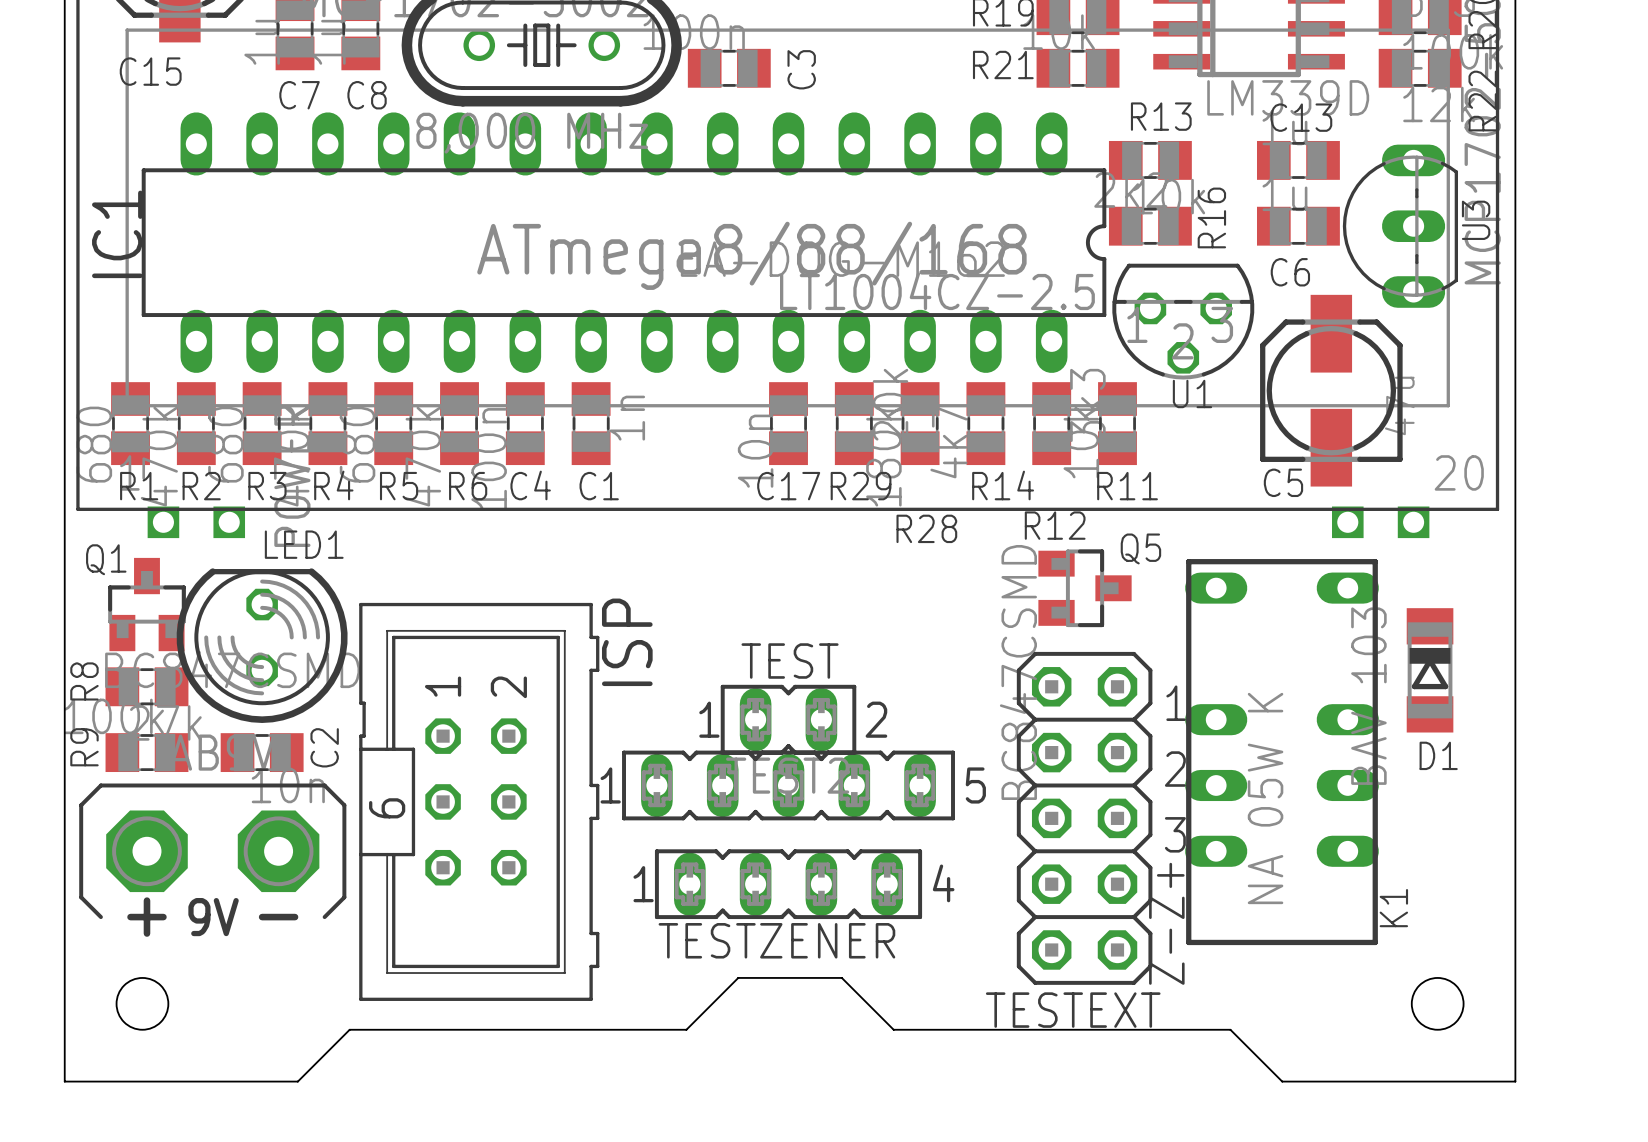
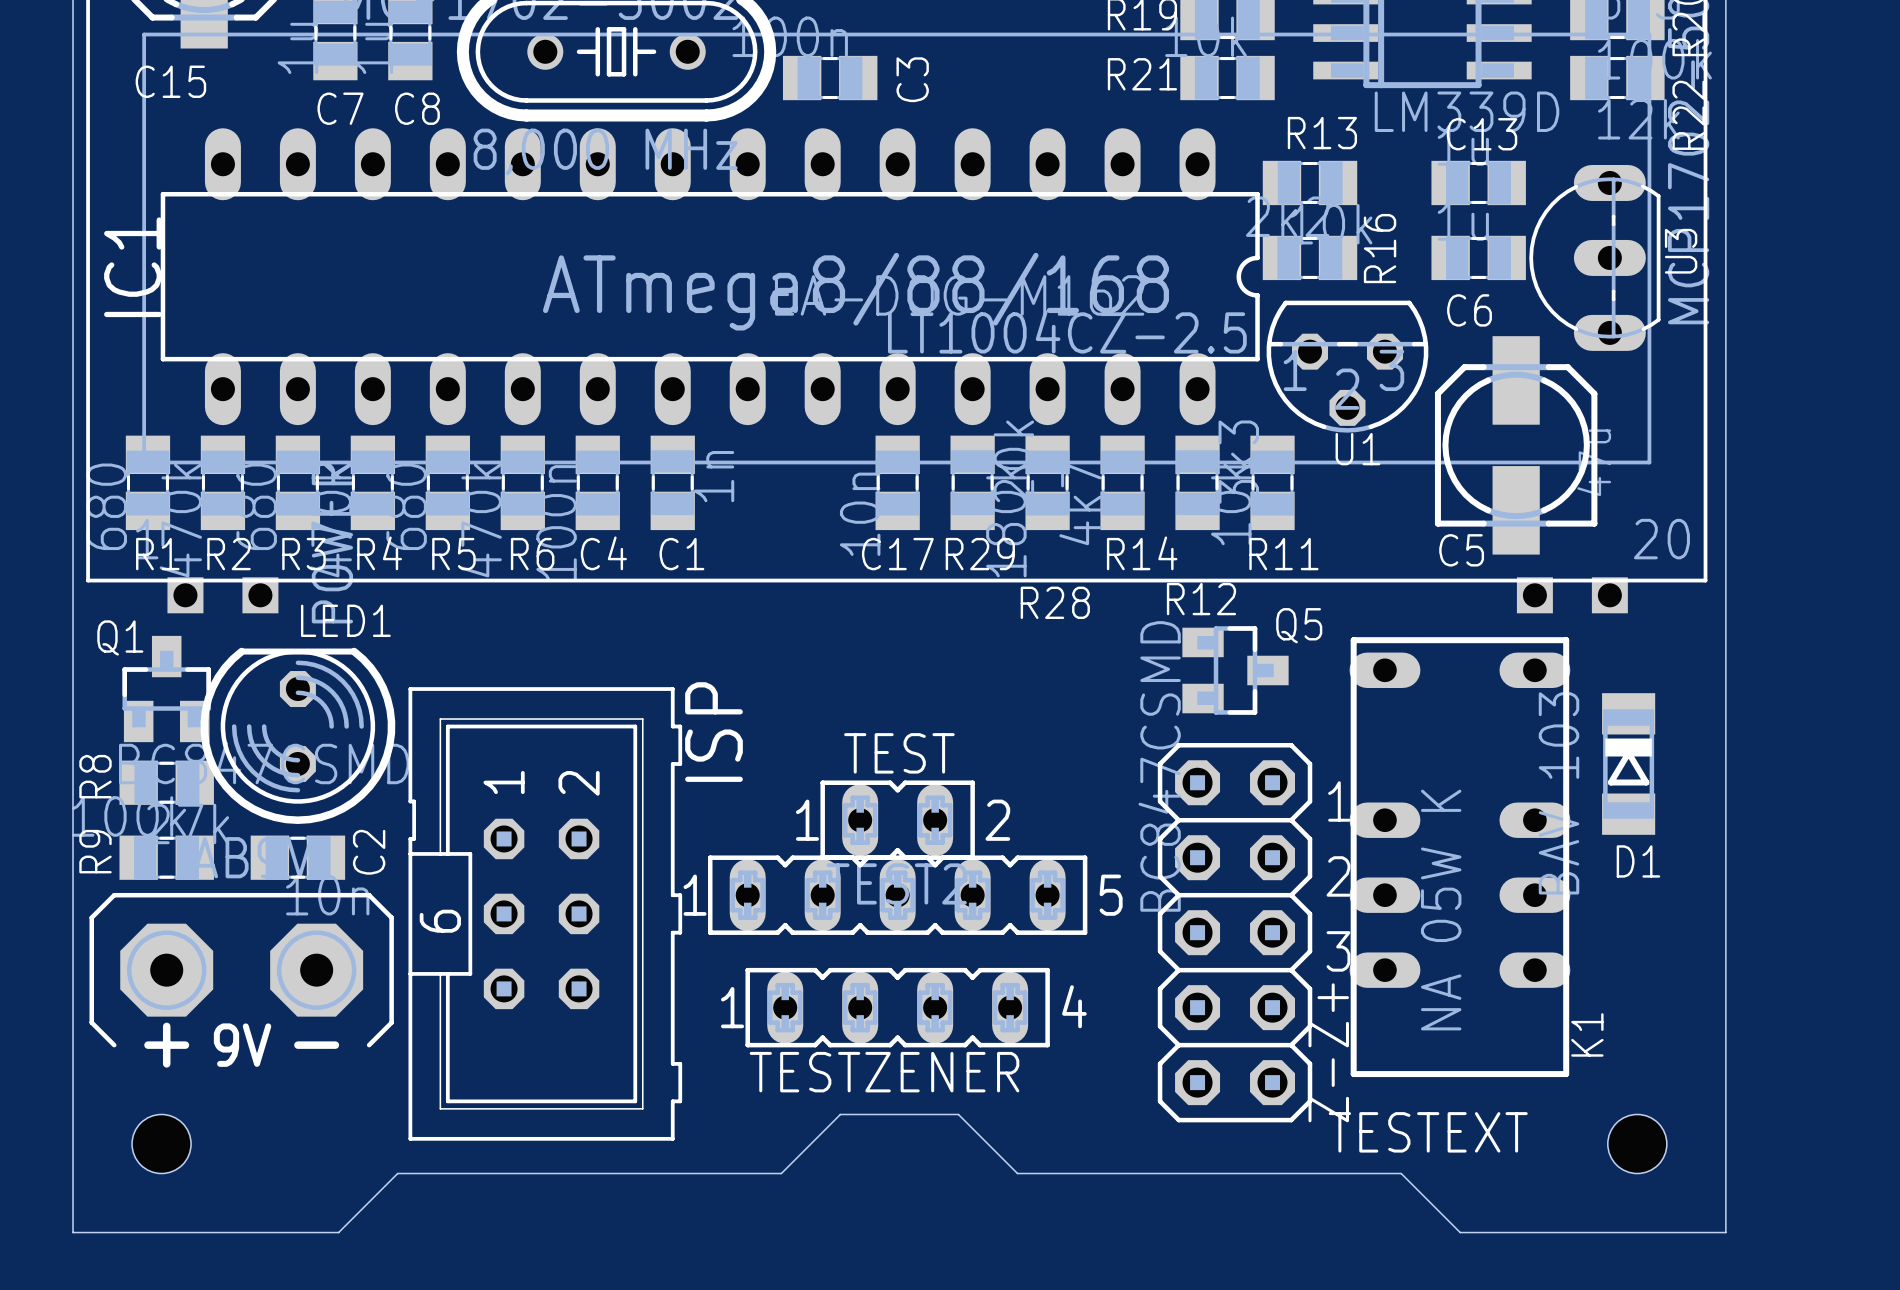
part value position: TESTEXT (1073, 1010) -> TESTEXT (1428, 1132)

